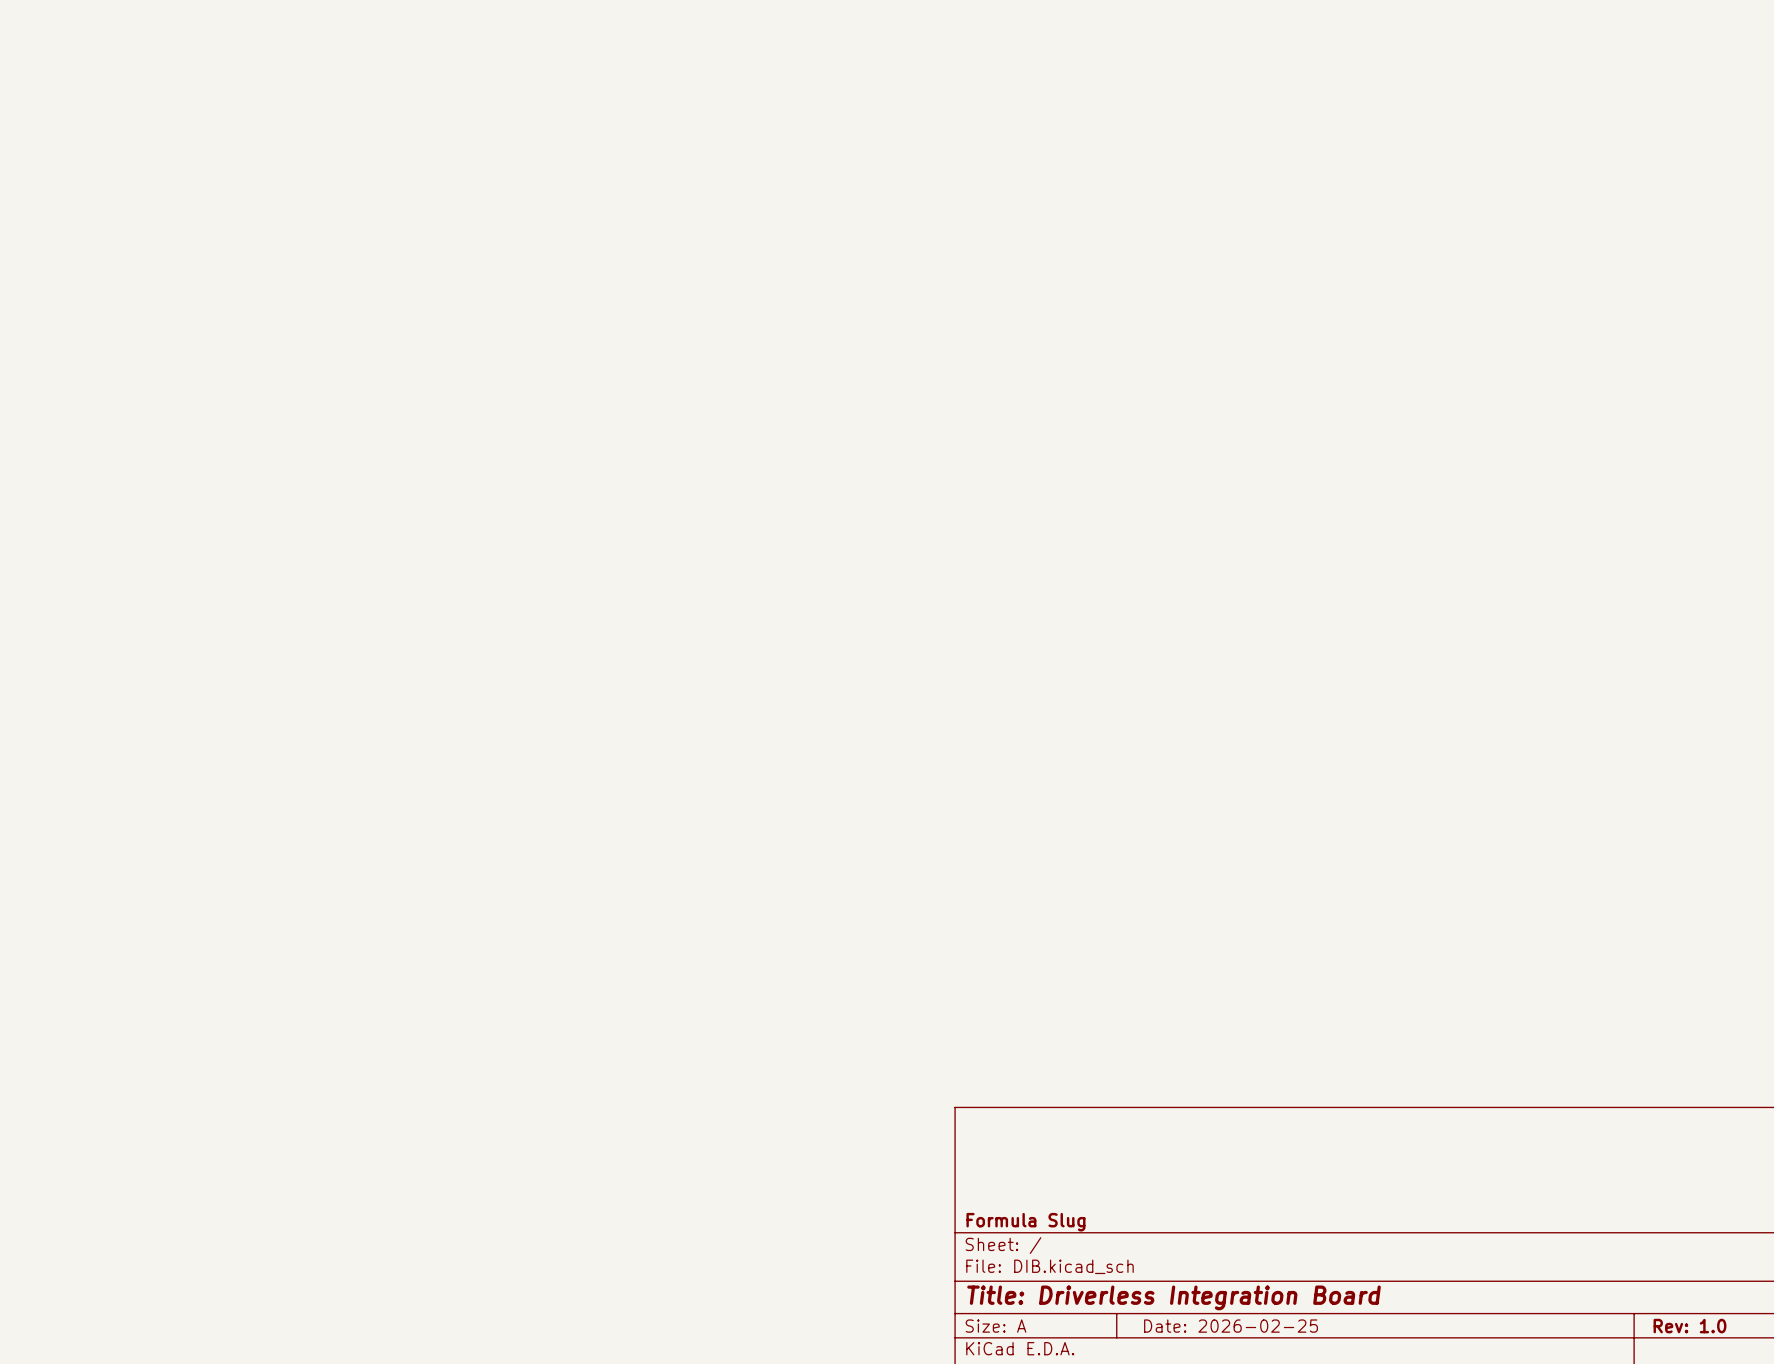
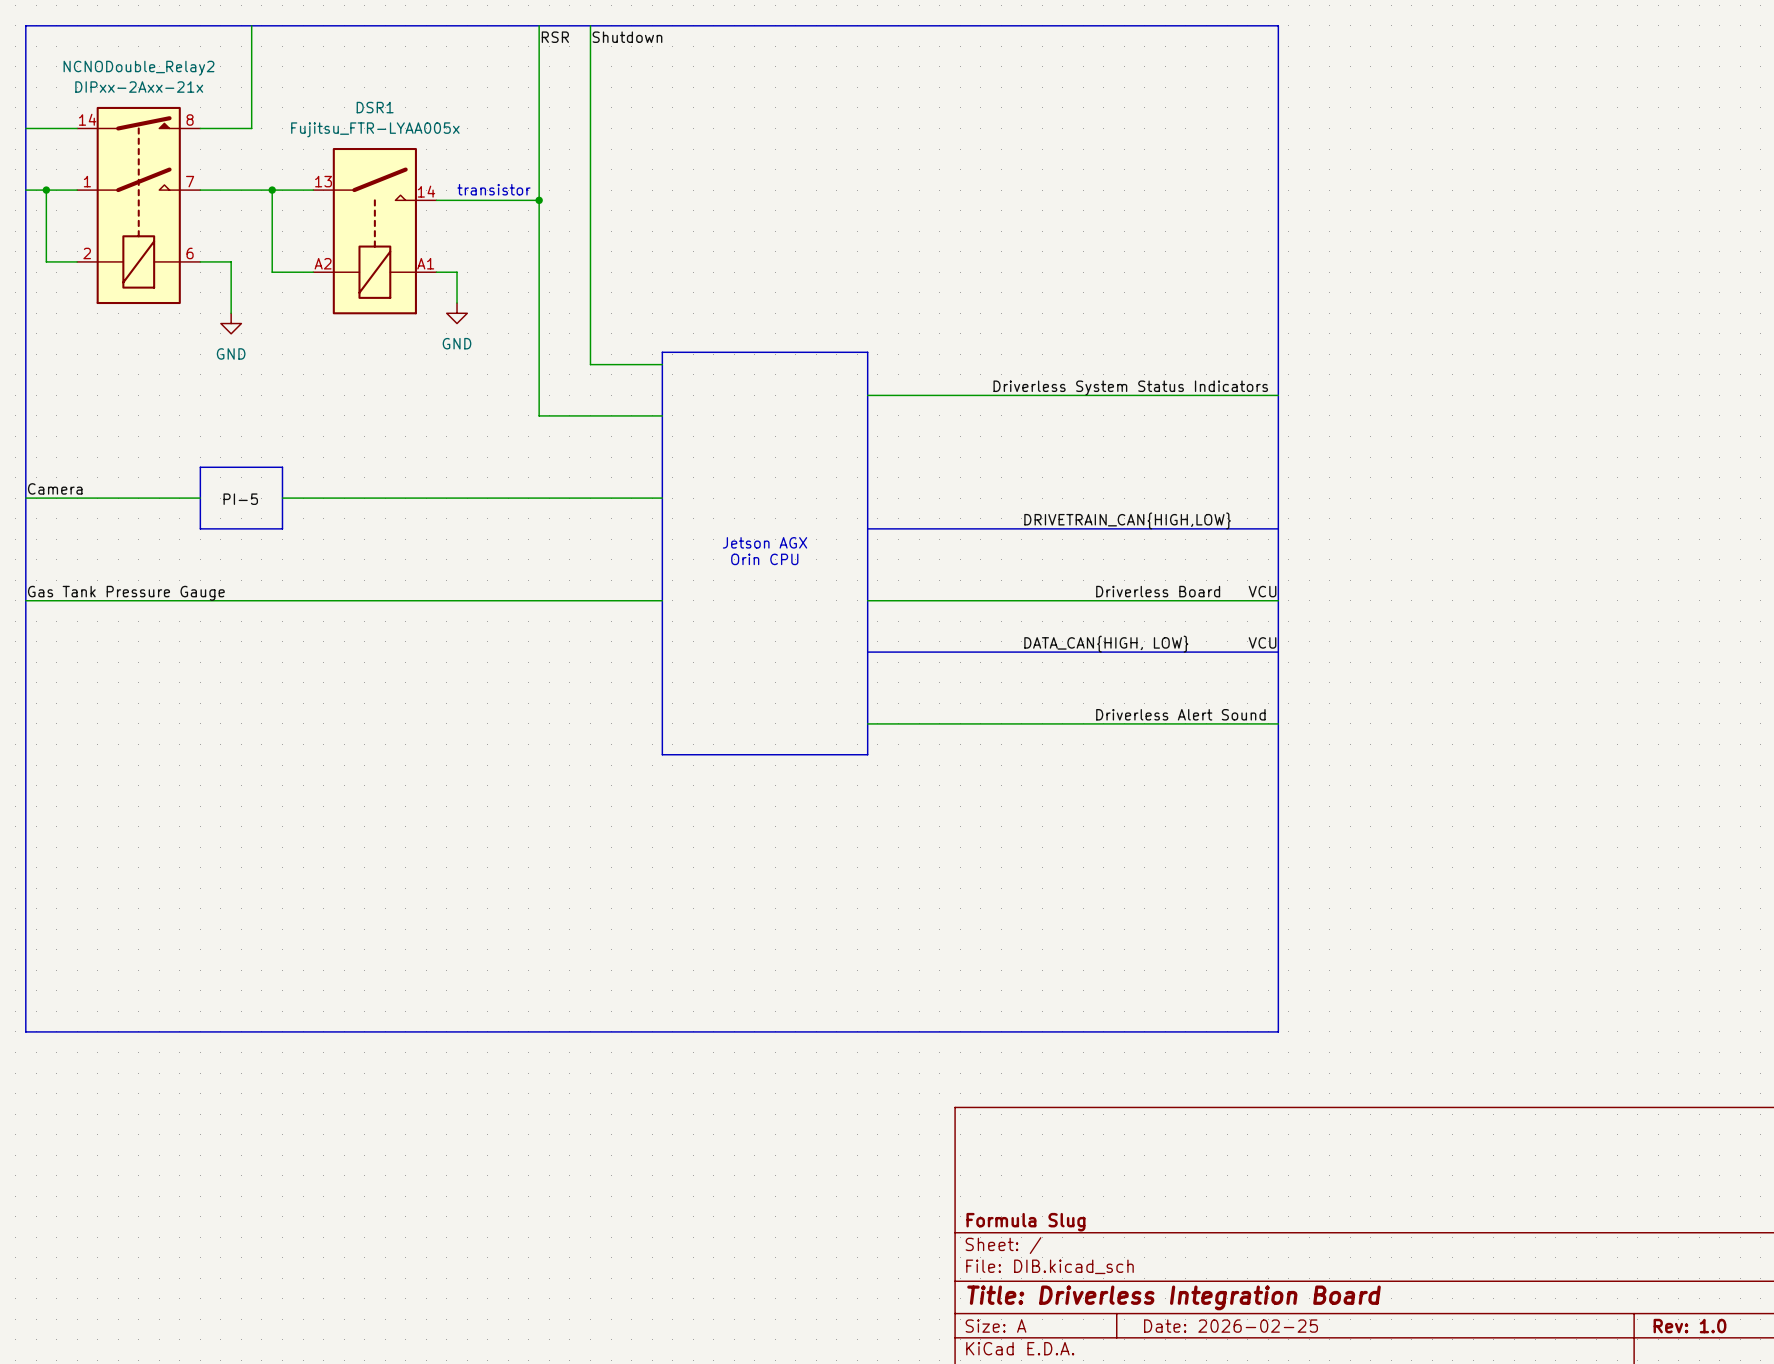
line: none -> (25, 25) (1278, 25) (1278, 1031) (25, 1031) (25, 25)
wire: none -> (251, 25) (251, 128) (200, 128)
wire: none -> (539, 25) (539, 415) (662, 415)
wire: none -> (590, 25) (590, 364) (662, 364)
label: none -> RSR (555, 37)
label: none -> Shutdown (627, 37)
wire: none -> (25, 128) (77, 128)
text: none -> transistor (493, 189)
wire: none -> (25, 190) (77, 190)
wire: none -> (46, 190) (46, 261) (77, 261)
junction: none -> (46, 190)
wire: none -> (200, 190) (313, 190)
wire: none -> (272, 190) (272, 272) (313, 272)
junction: none -> (272, 190)
wire: none -> (436, 200) (539, 200)
junction: none -> (539, 200)
NCNODouble_Relay2: none -> DIPxx-2Axx-21x (138, 205)
DSR1: none -> Fujitsu_FTR-LYAA005x (374, 231)
wire: none -> (200, 261) (231, 261) (231, 313)
wire: none -> (436, 272) (457, 272) (457, 303)
power symbol: none -> GND (457, 313)
power symbol: none -> GND (231, 323)
line: none -> (662, 352) (867, 352) (867, 754) (662, 754) (662, 352)
label: none -> Driverless System Status Indicators (1130, 387)
wire: none -> (867, 395) (1278, 395)
line: none -> (200, 467) (282, 467) (282, 528) (200, 528) (200, 467)
label: none -> Camera (55, 488)
wire: none -> (25, 498) (200, 498)
wire: none -> (282, 498) (662, 498)
label: none -> PI-5 (240, 499)
label: none -> DRIVETRAIN_CAN{HIGH,LOW} (1127, 520)
bus: none -> (867, 528) (1278, 528)
text: none -> Jetson AGX (765, 542)
text: none -> Orin CPU (764, 559)
label: none -> Driverless Board (1158, 591)
label: none -> VCU (1262, 591)
label: none -> Gas Tank Pressure Gauge (126, 593)
wire: none -> (25, 600) (662, 600)
wire: none -> (867, 600) (1278, 600)
label: none -> VCU (1262, 642)
label: none -> DATA_CAN{HIGH, LOW} (1106, 644)
bus: none -> (867, 652) (1278, 652)
label: none -> Driverless Alert Sound (1180, 714)
wire: none -> (867, 723) (1278, 723)

